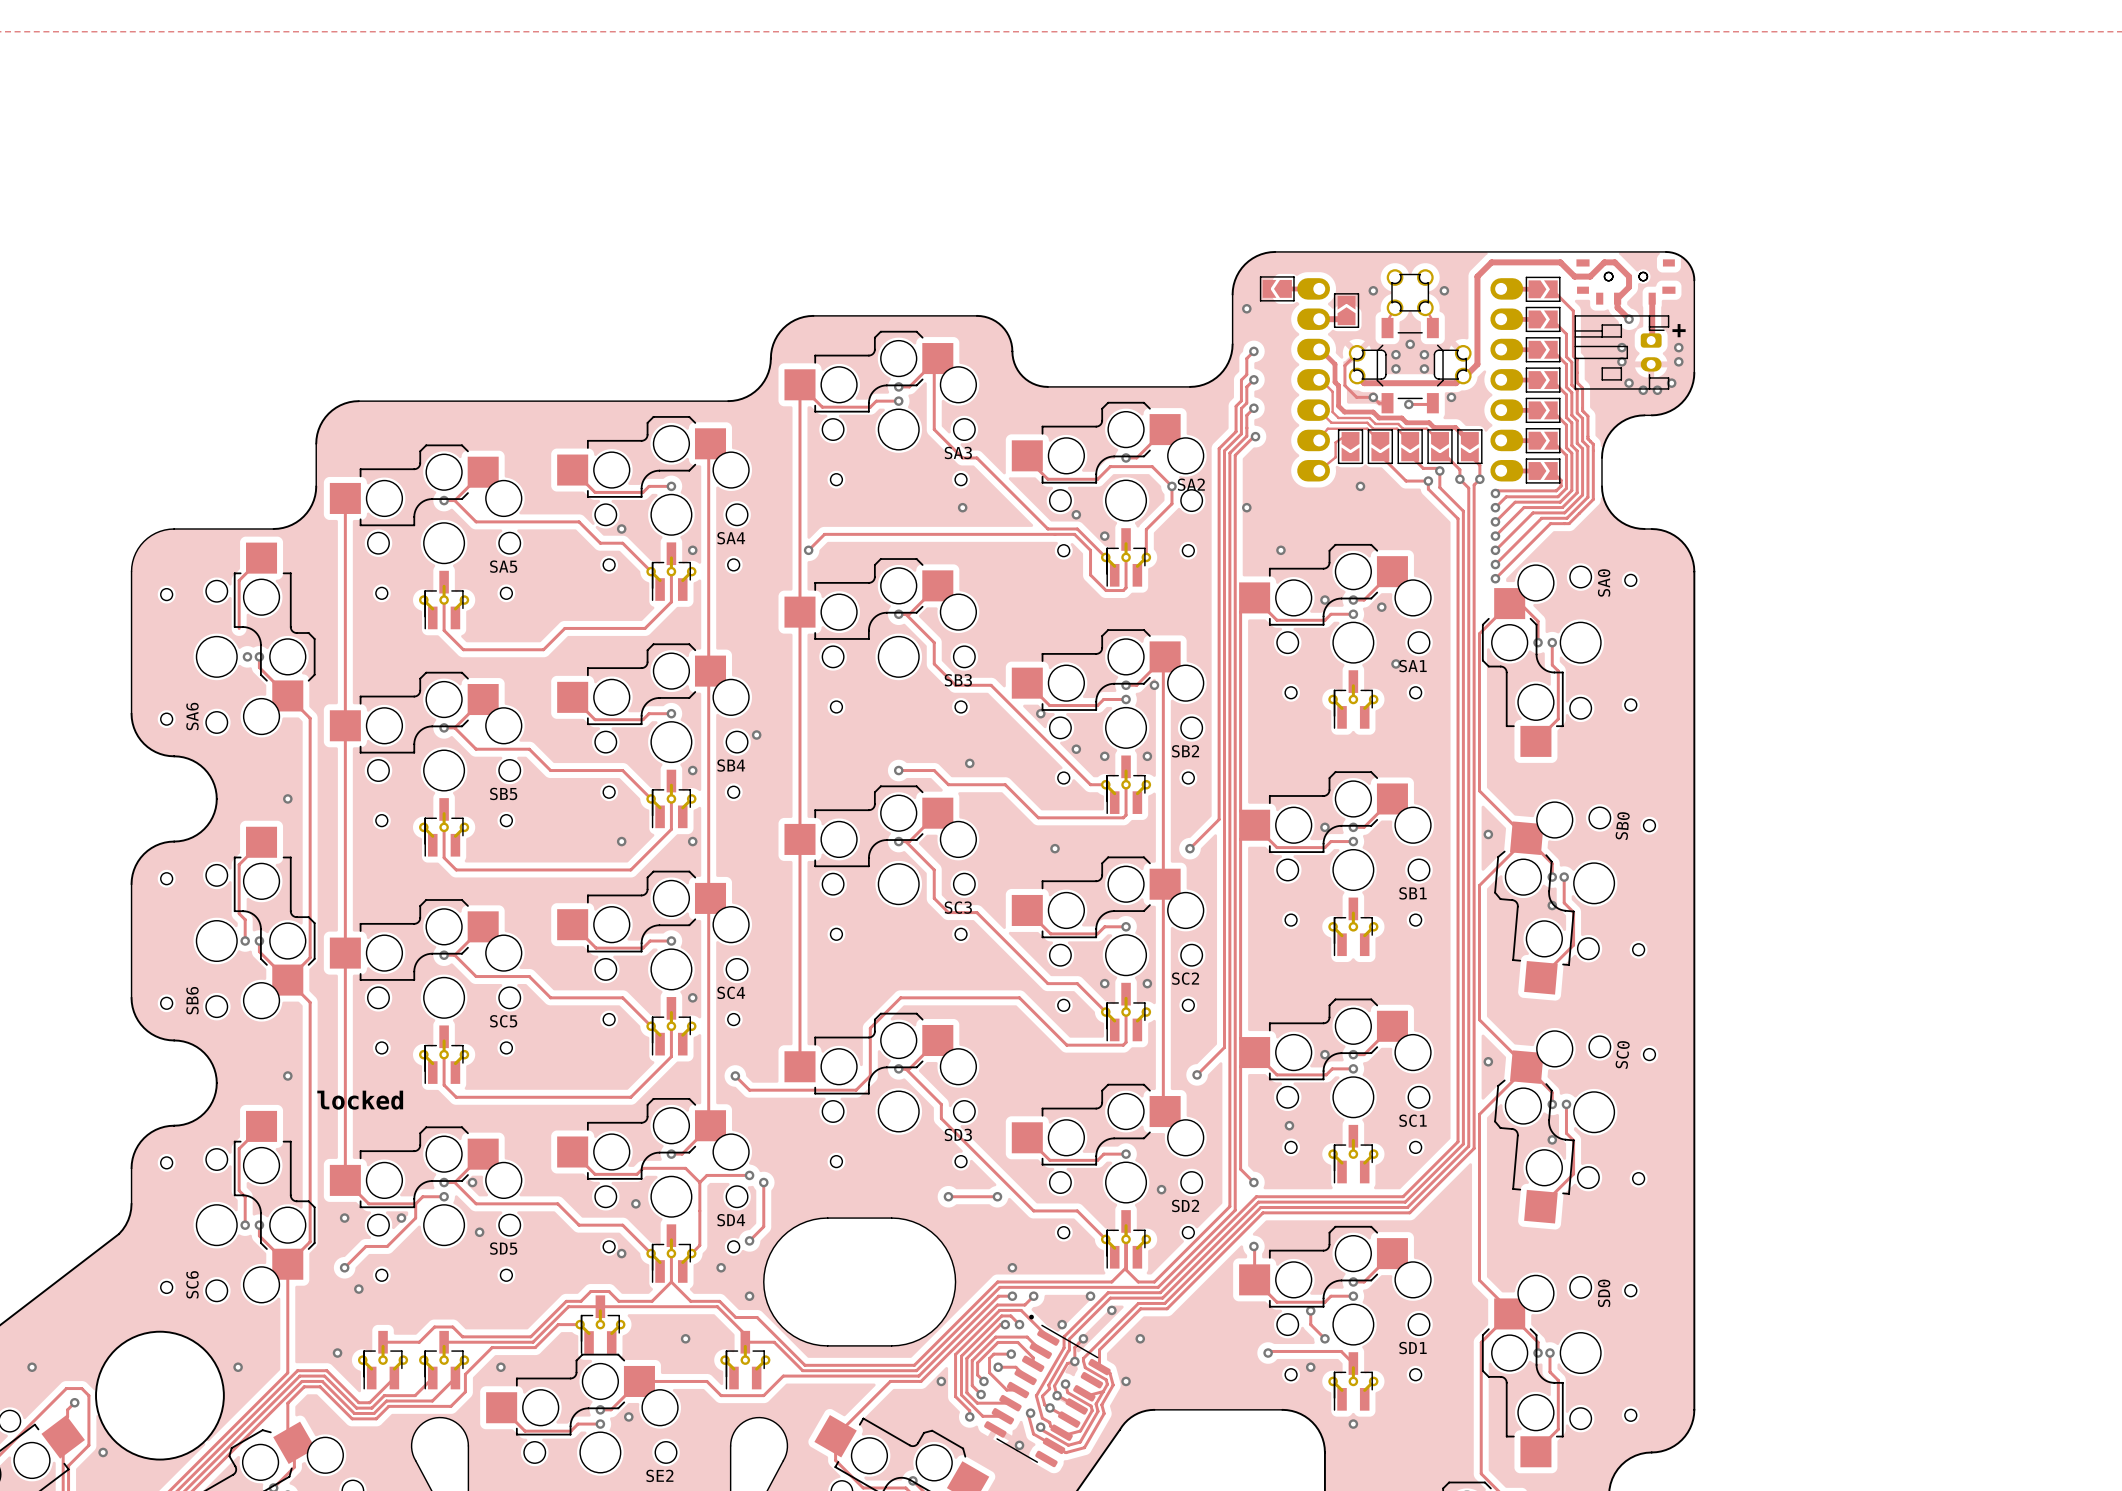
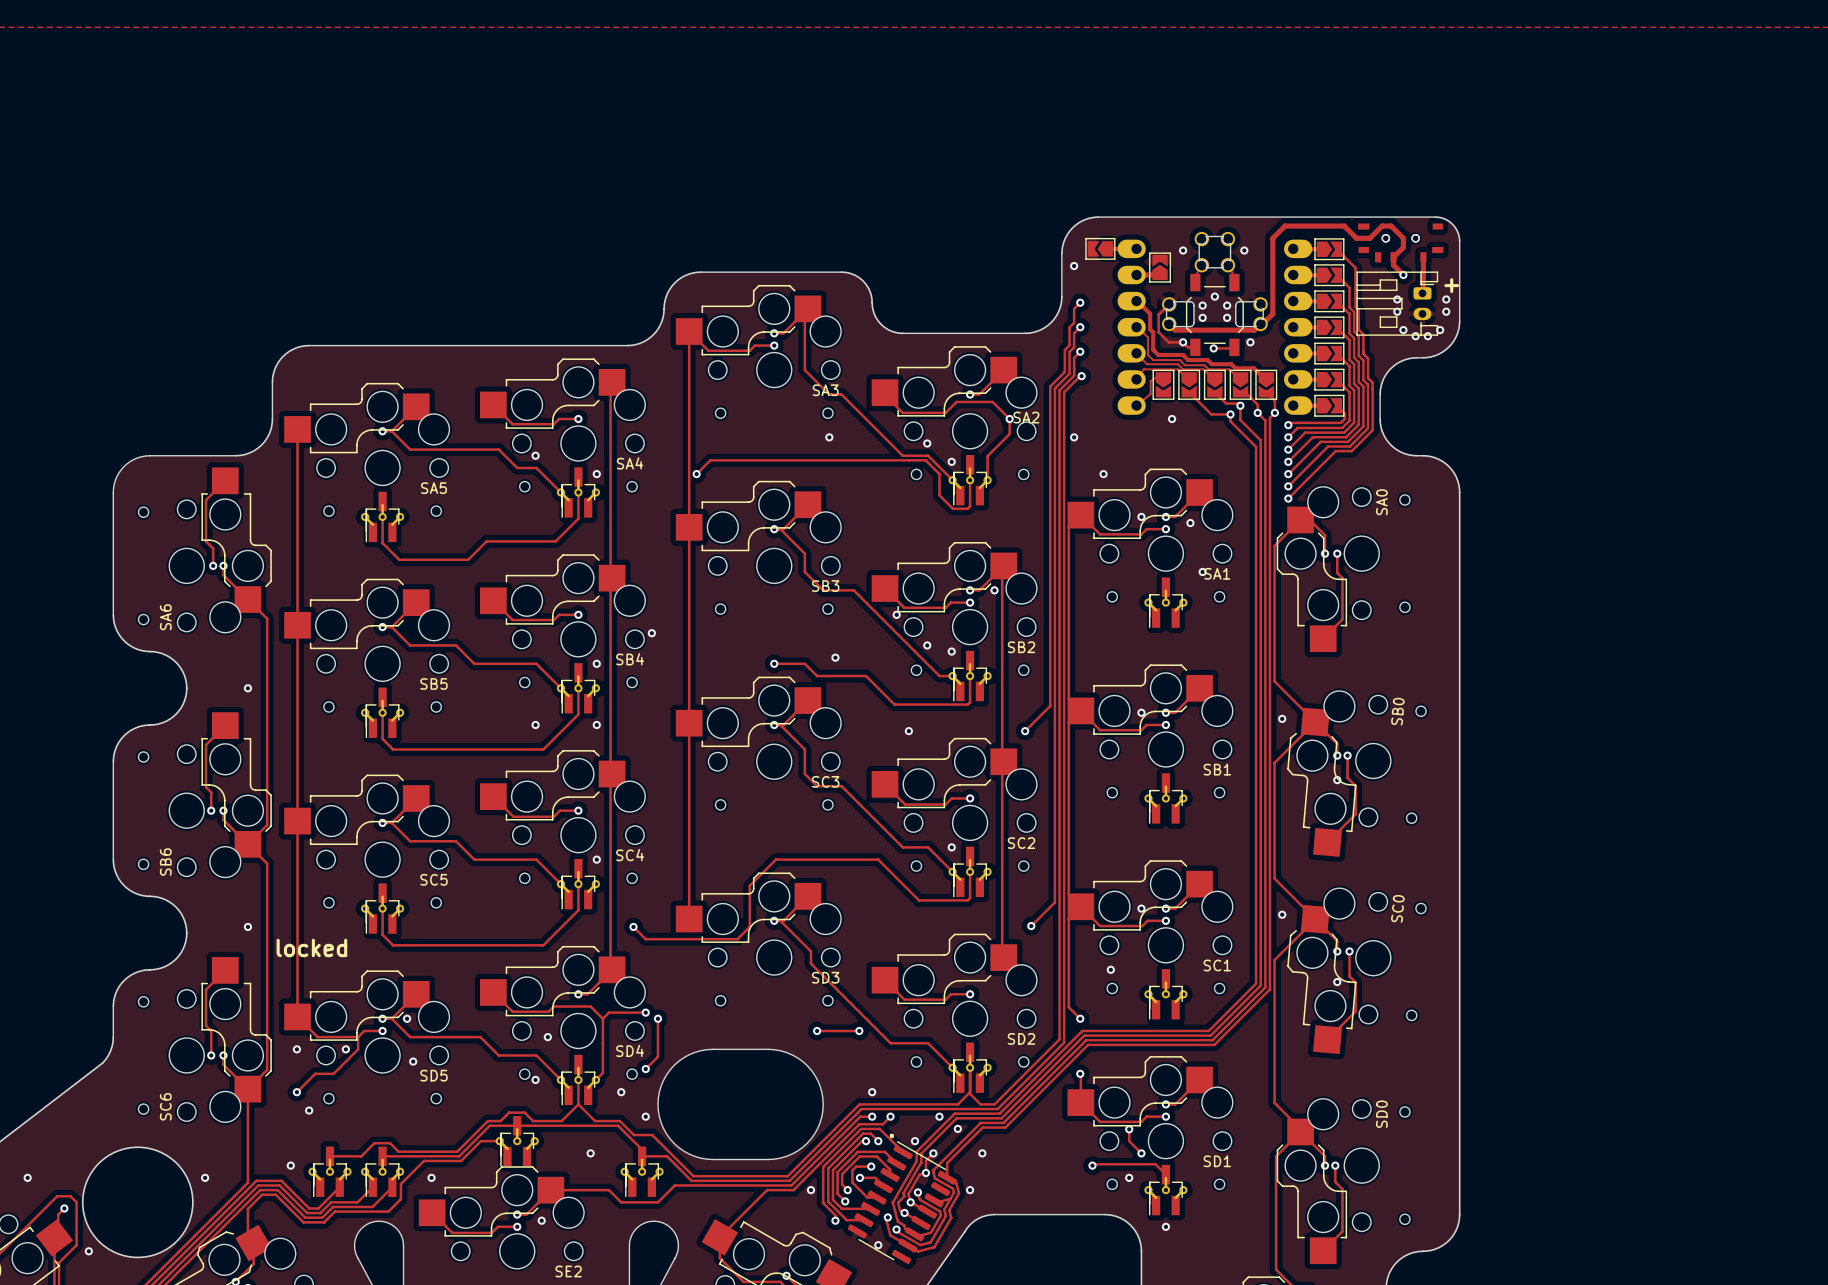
track: none -> (206, 541) (213, 548) (213, 565)
via: (1147, 756) -> none
via: (1147, 983) -> none
via: (1161, 1189) -> none

